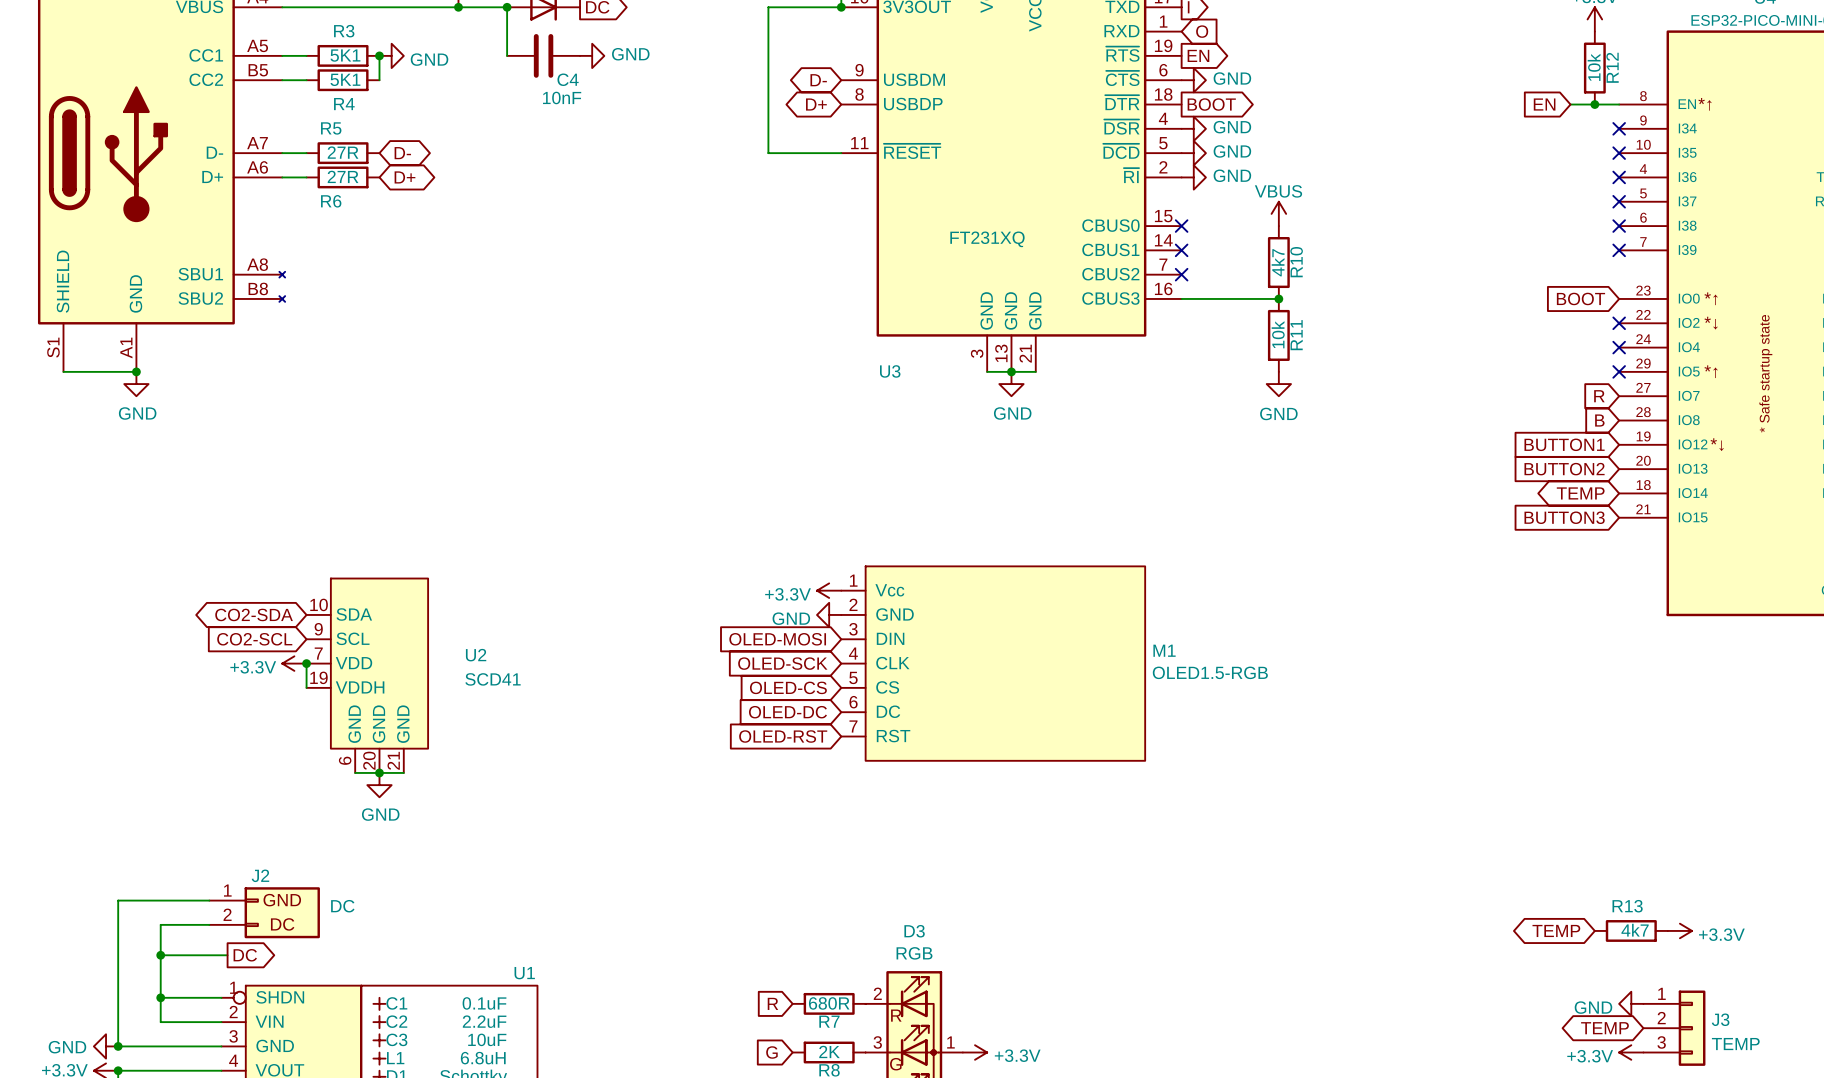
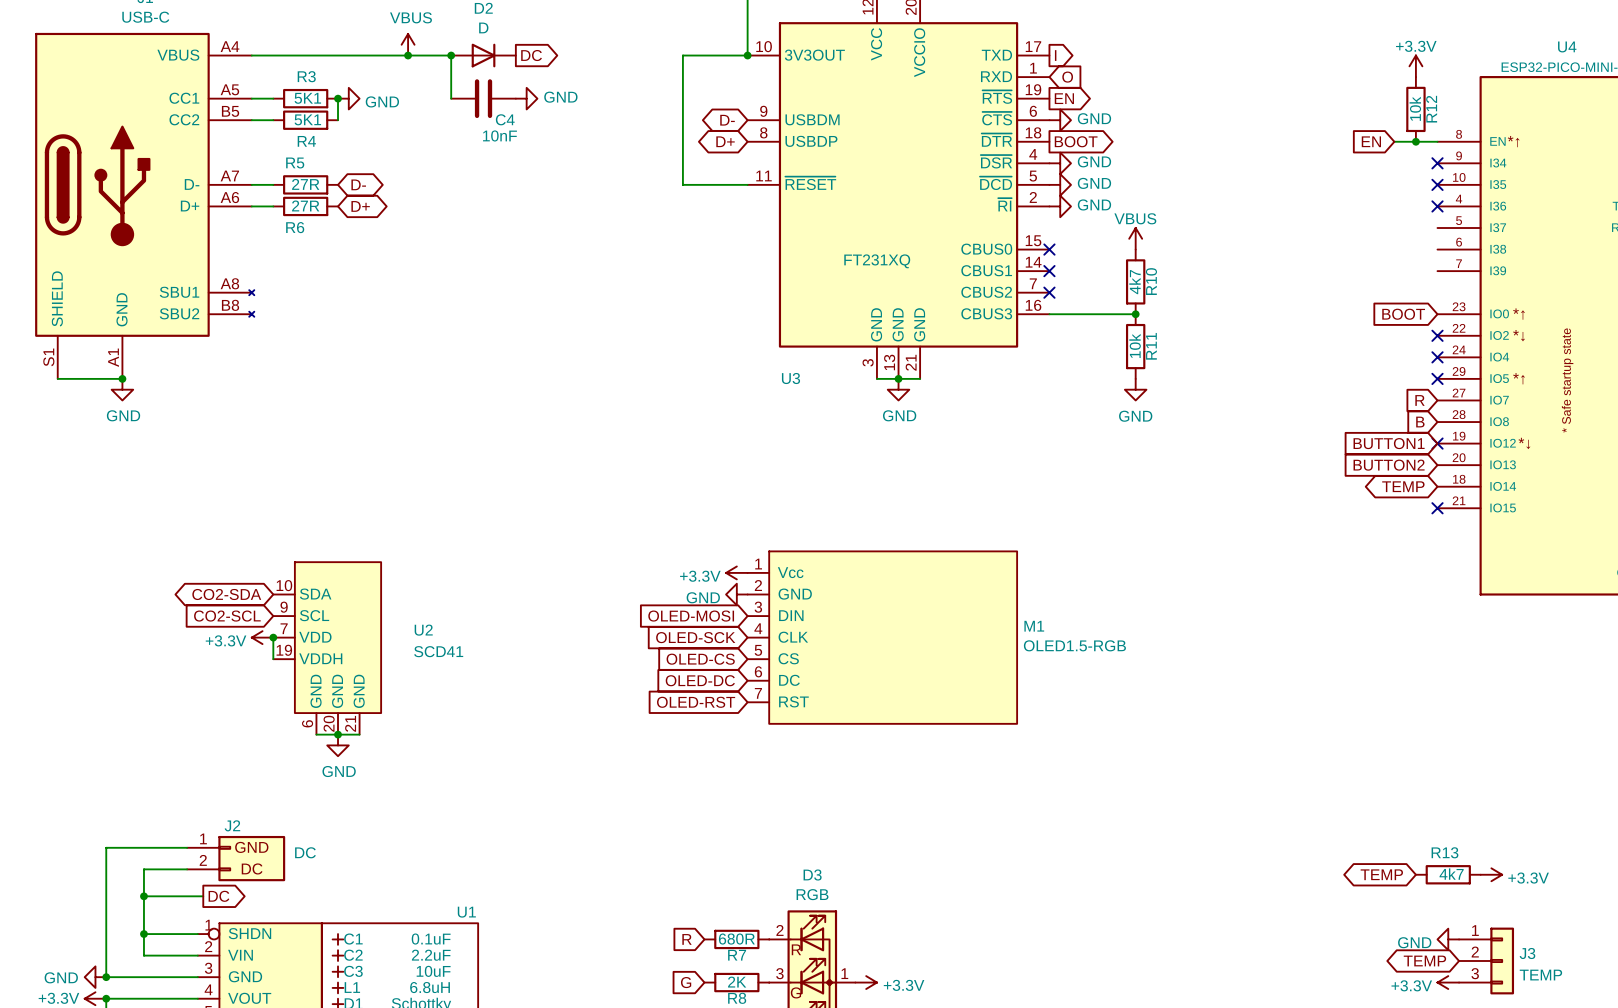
no-connect mark: (1619, 201) -> none
no-connect mark: (1619, 226) -> none
no-connect mark: (1619, 250) -> none
no-connect mark: none -> (1437, 443)
global label: BUTTON3 (1564, 517) -> none
no-connect mark: none -> (1437, 508)

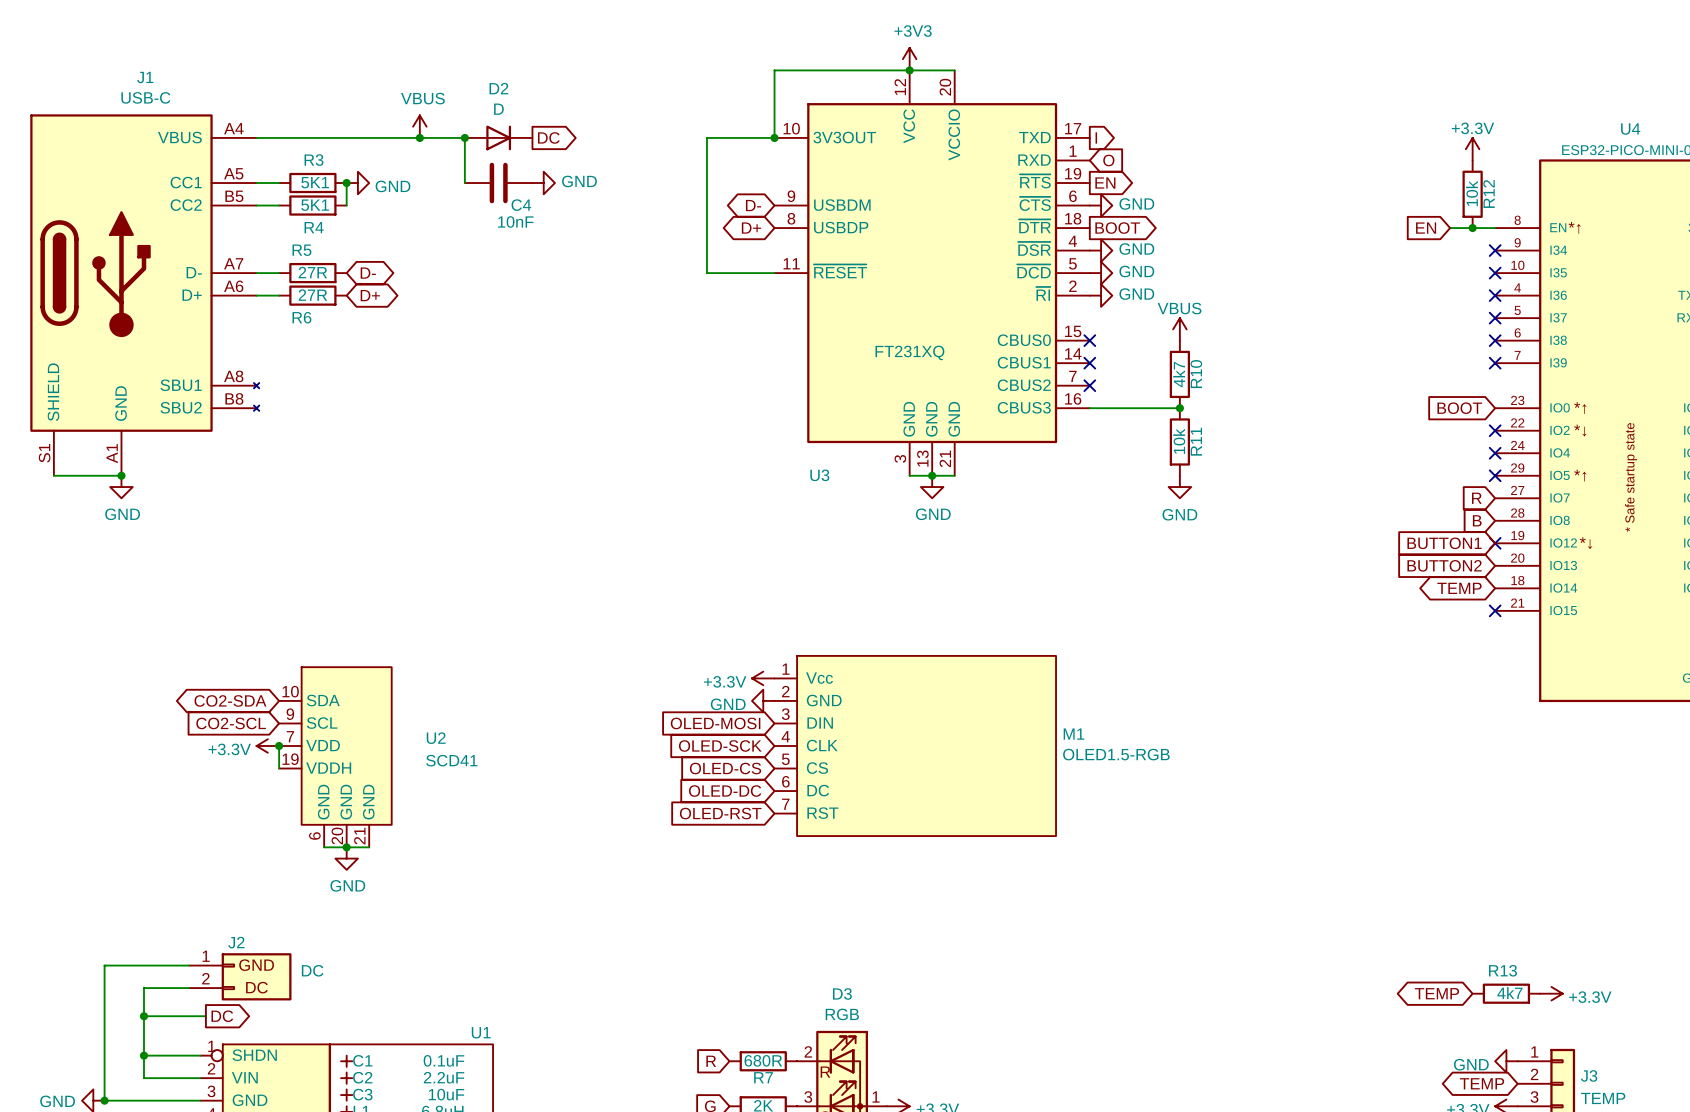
no-connect mark: none -> (1495, 318)
no-connect mark: none -> (1495, 340)
no-connect mark: none -> (1495, 363)

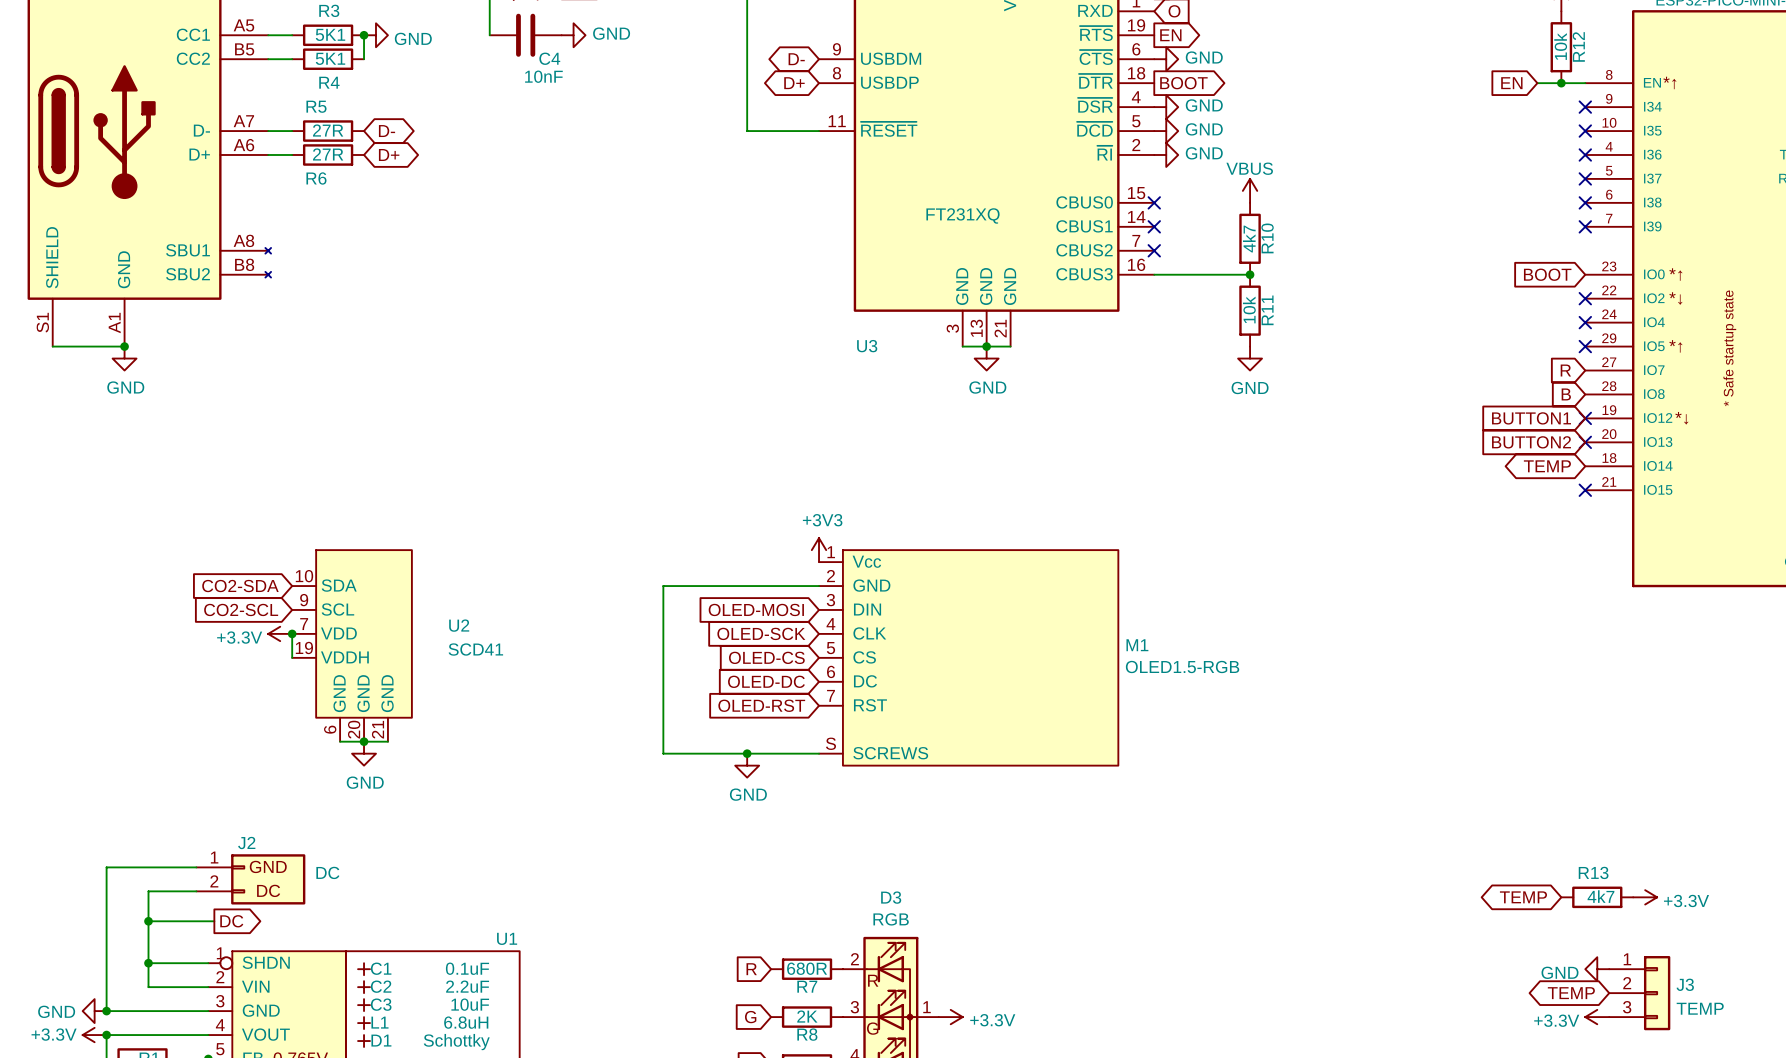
no-connect mark: none -> (1585, 442)
M1 symbol: [774, 655, 1057, 837] -> [819, 550, 1119, 766]
power symbol: none -> +3V3 (819, 550)
power symbol: +3.3V (763, 678) -> none
global label shape: bidirectional (230, 700) -> input (240, 586)
power symbol rotation: 0° (763, 700) -> 90° counterclockwise (747, 765)
power symbol position: GND (763, 700) -> GND (747, 765)
wire: none -> (819, 586) (663, 586) (663, 753) (819, 753)
junction: none -> (747, 753)

